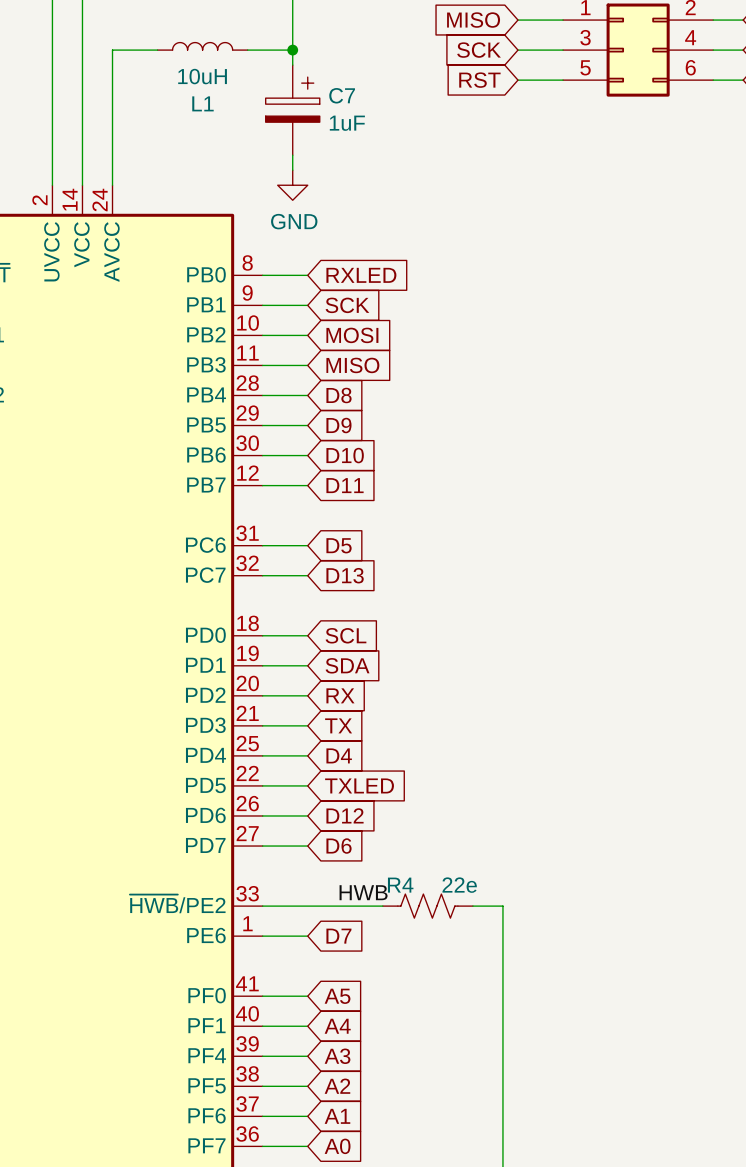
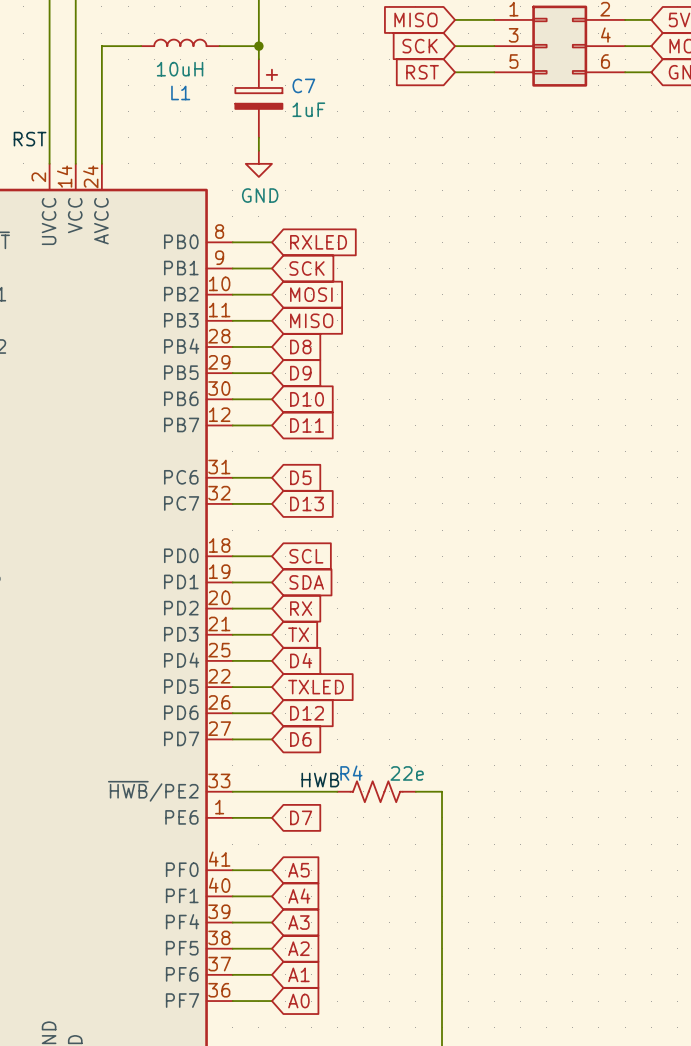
label: none -> RST (30, 139)

